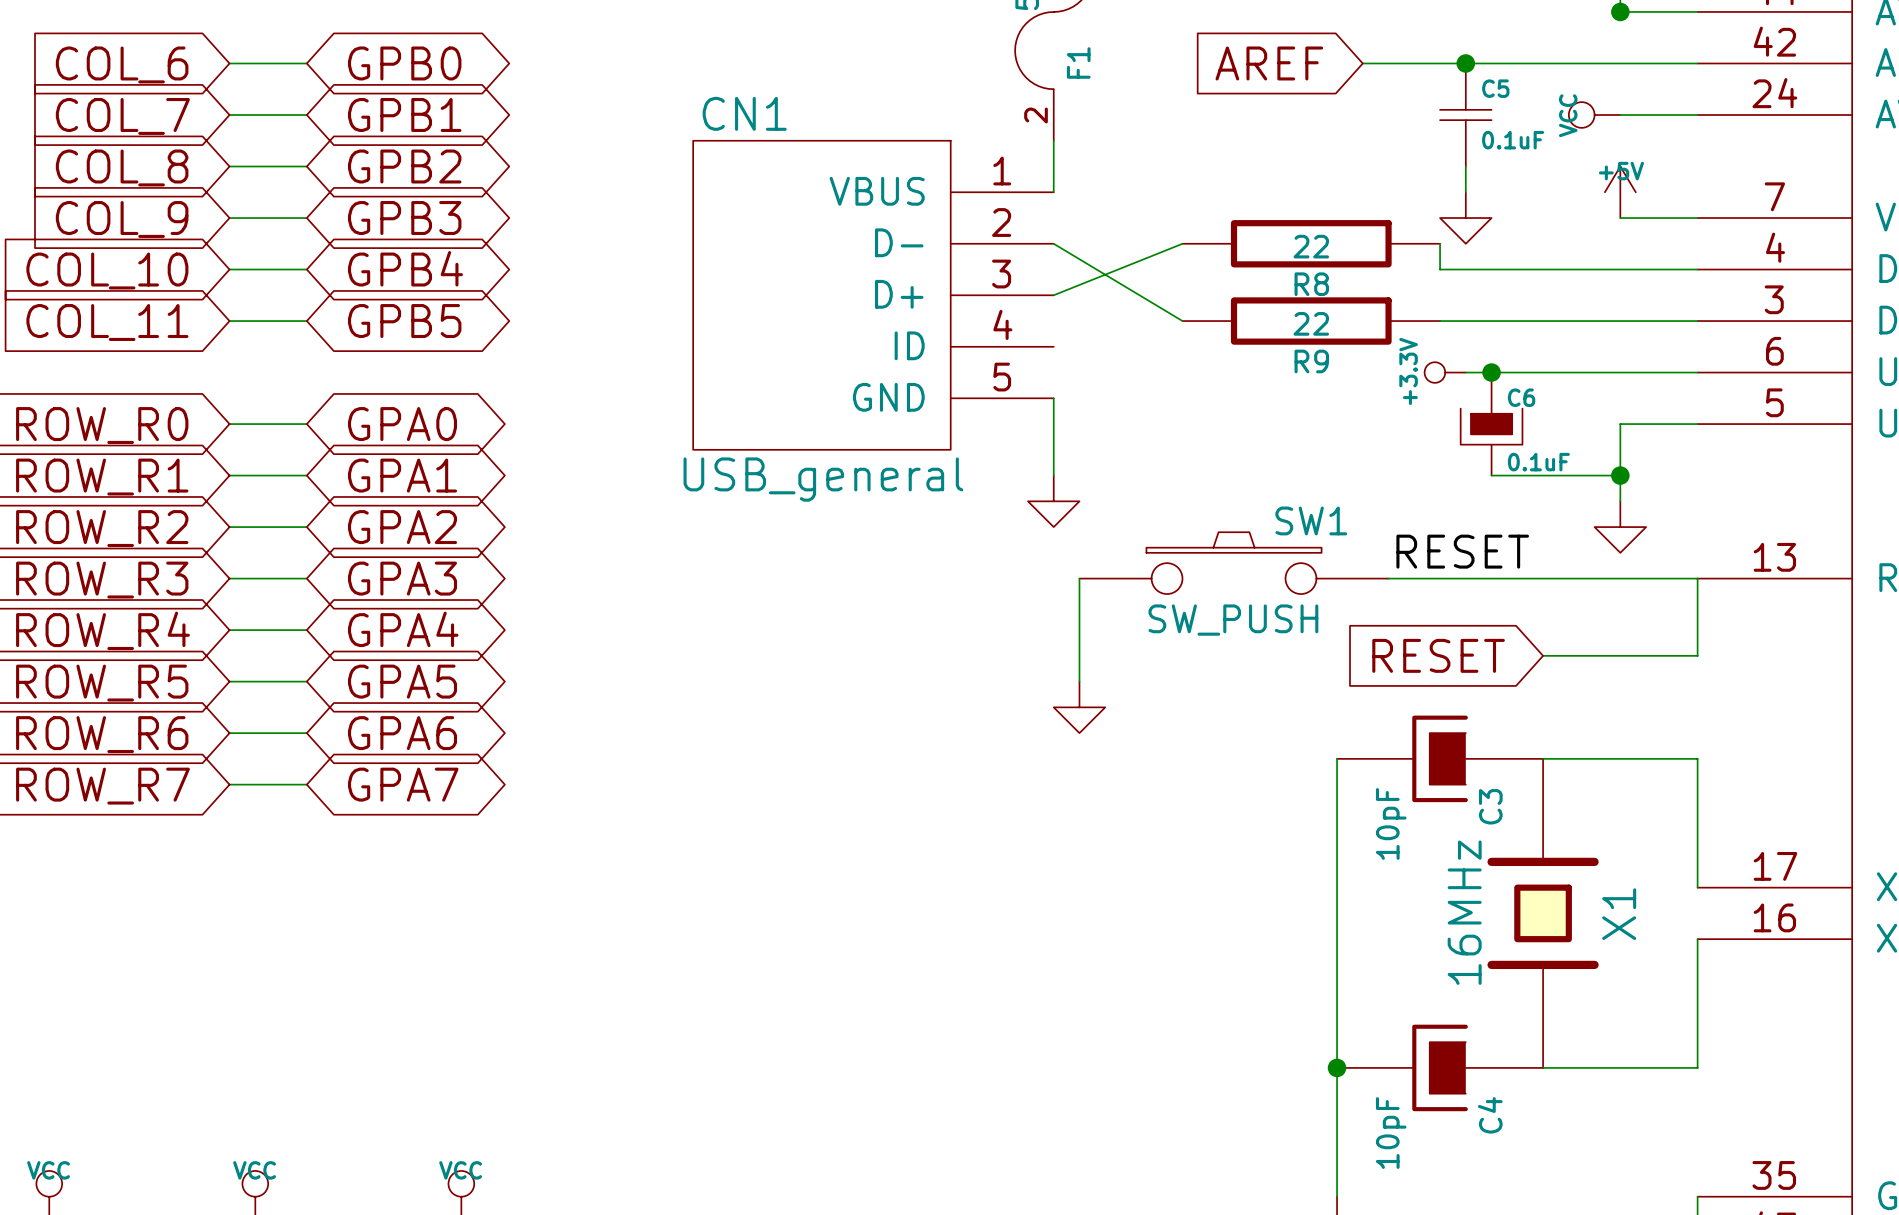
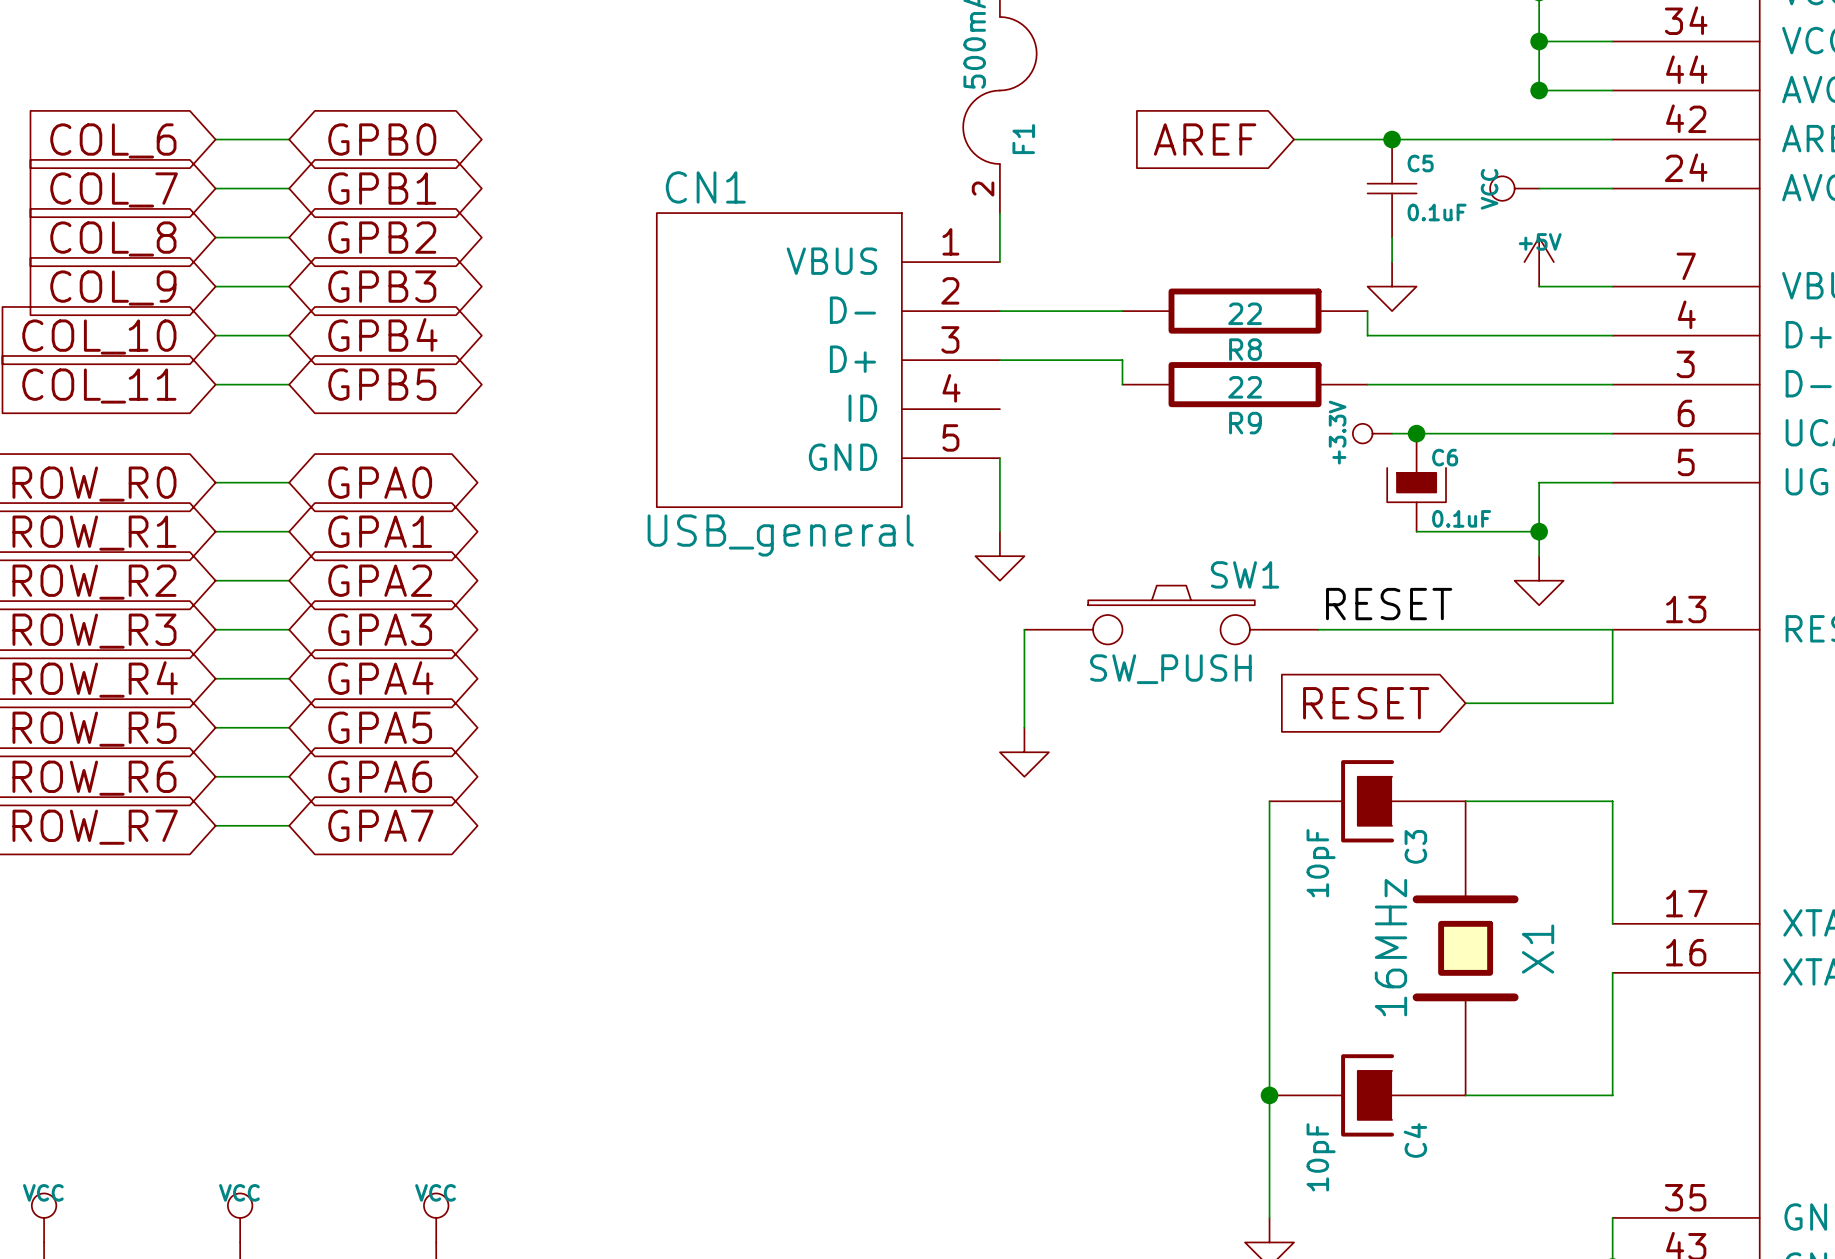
wire: (1053, 243) (1182, 321) -> (999, 360) (1122, 360) (1122, 384)
wire: (1182, 243) (1053, 295) -> (1122, 311) (999, 311)

